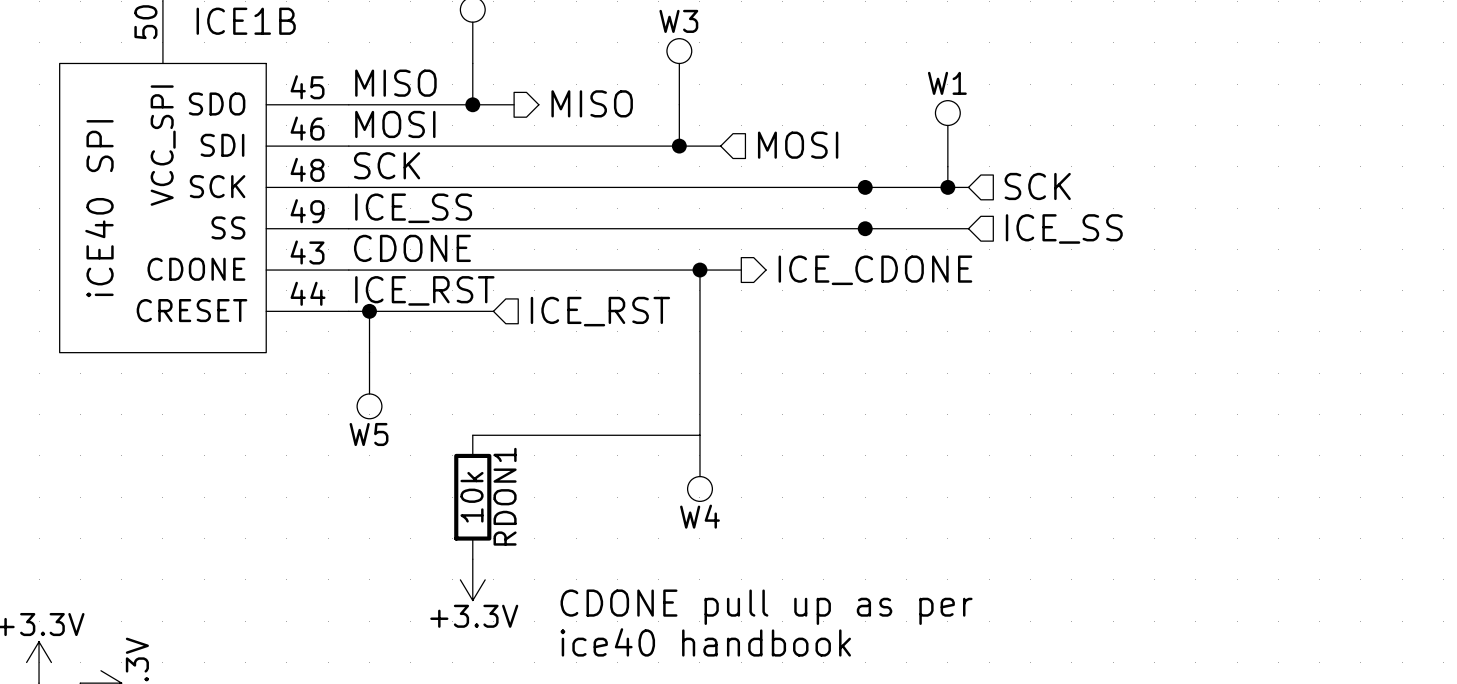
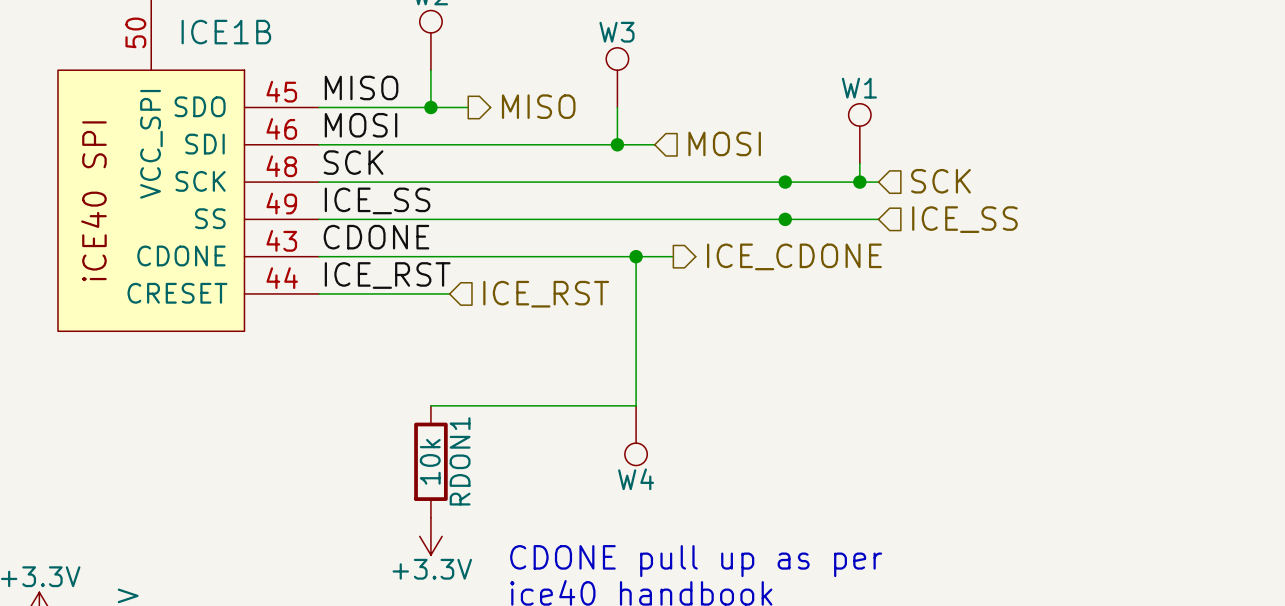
wire: (369, 311) (369, 352) -> none
junction: (369, 311) -> none
W5: (369, 385) -> none

